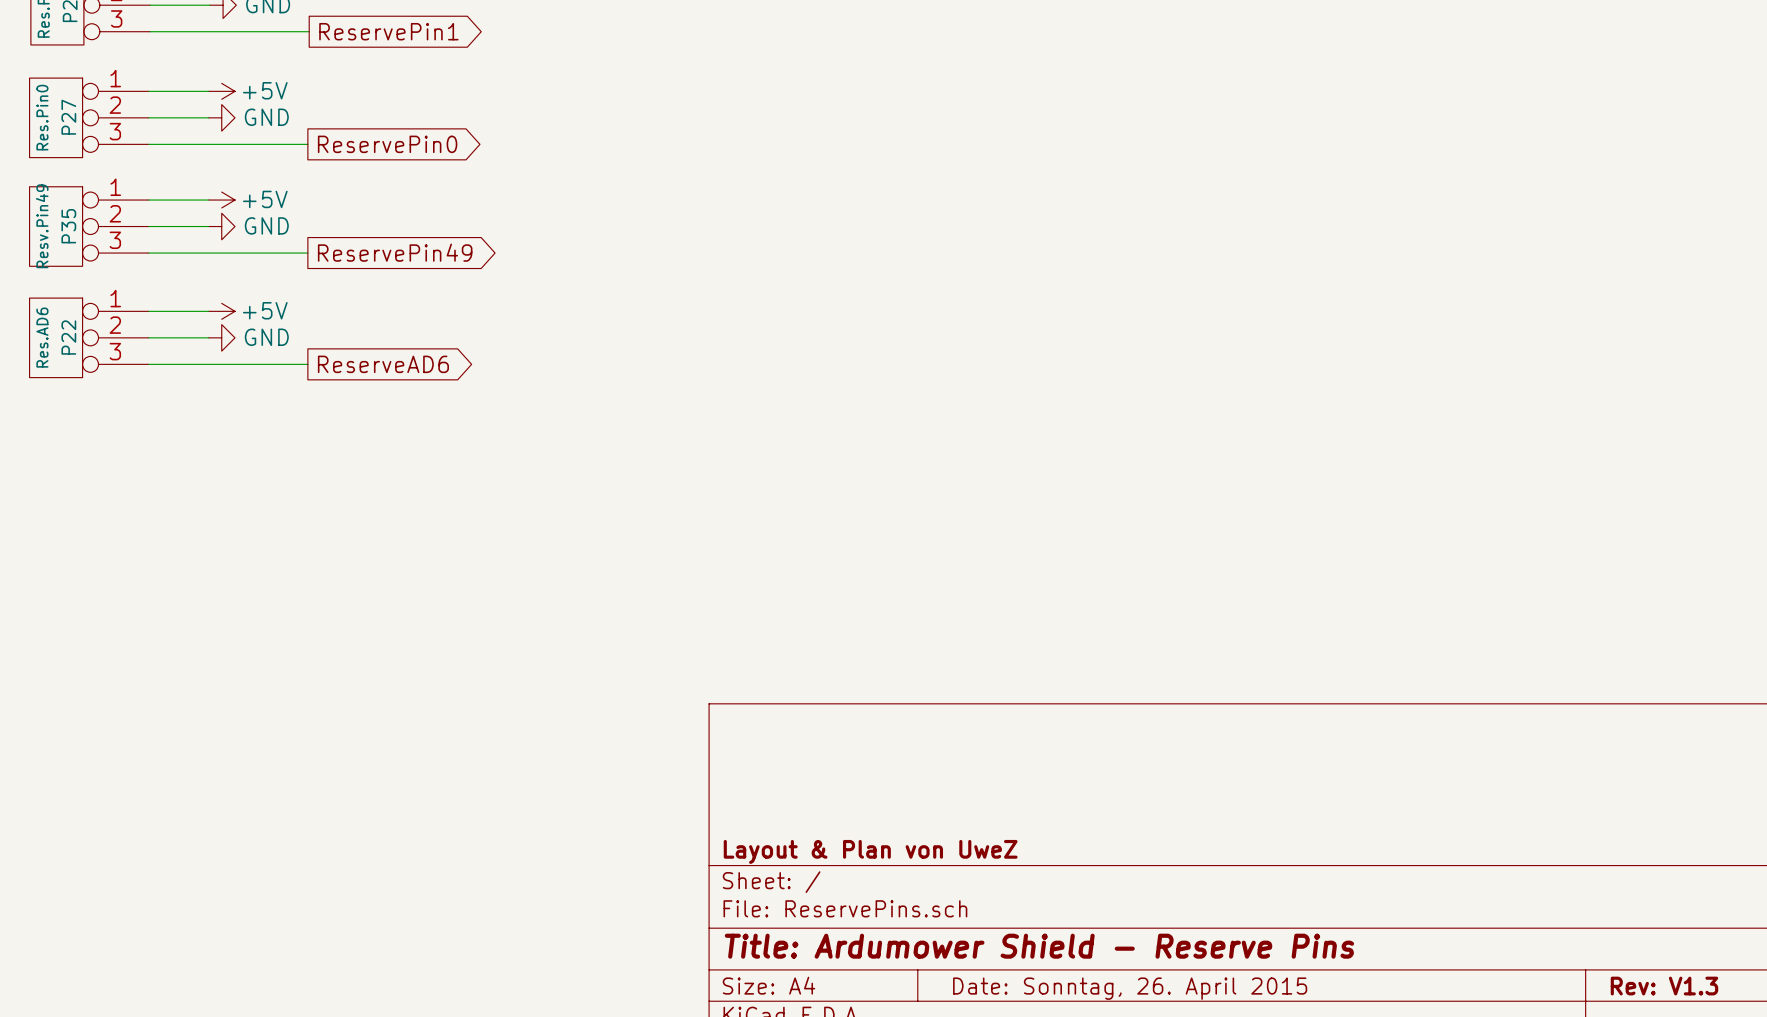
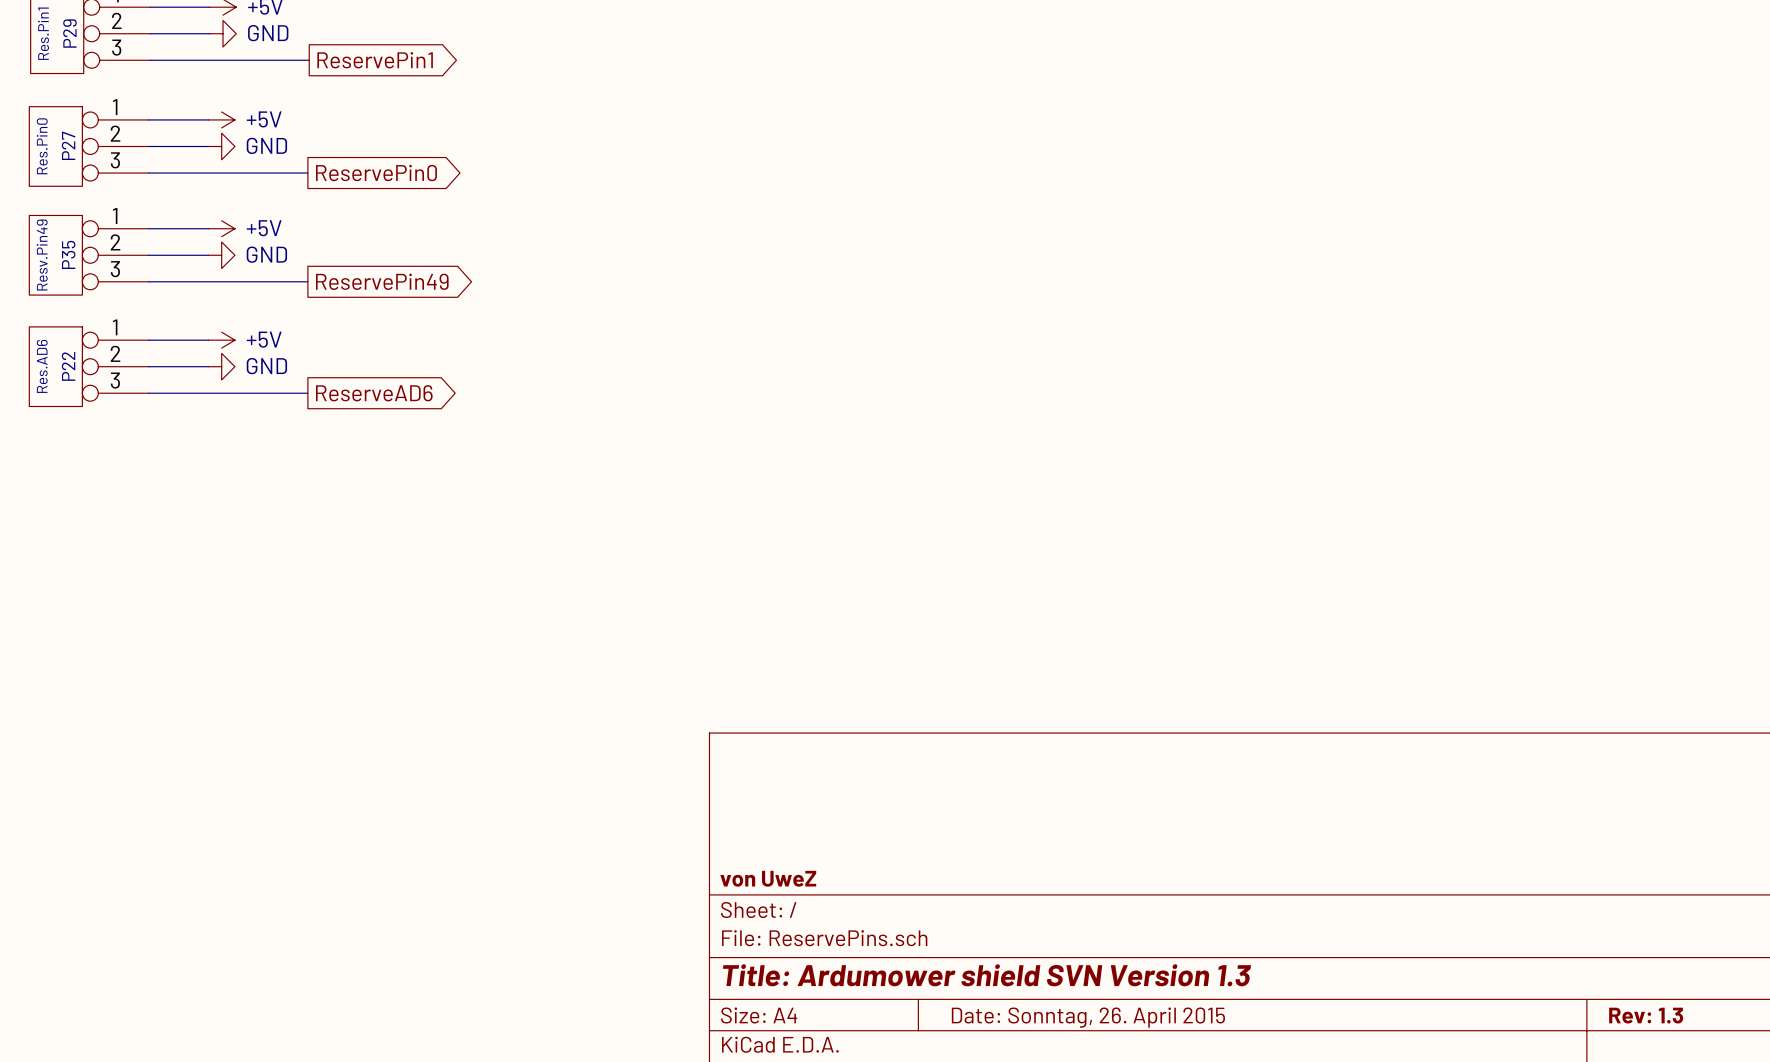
title block: Layout & Plan von UweZ (870, 851) -> von UweZ (768, 878)
title block: Title: Ardumower Shield - Reserve Pins (1039, 946) -> Title: Ardumower shield SVN Version 1.3 (986, 975)
title block: Rev: V1.3 (1664, 986) -> Rev: 1.3 (1646, 1015)

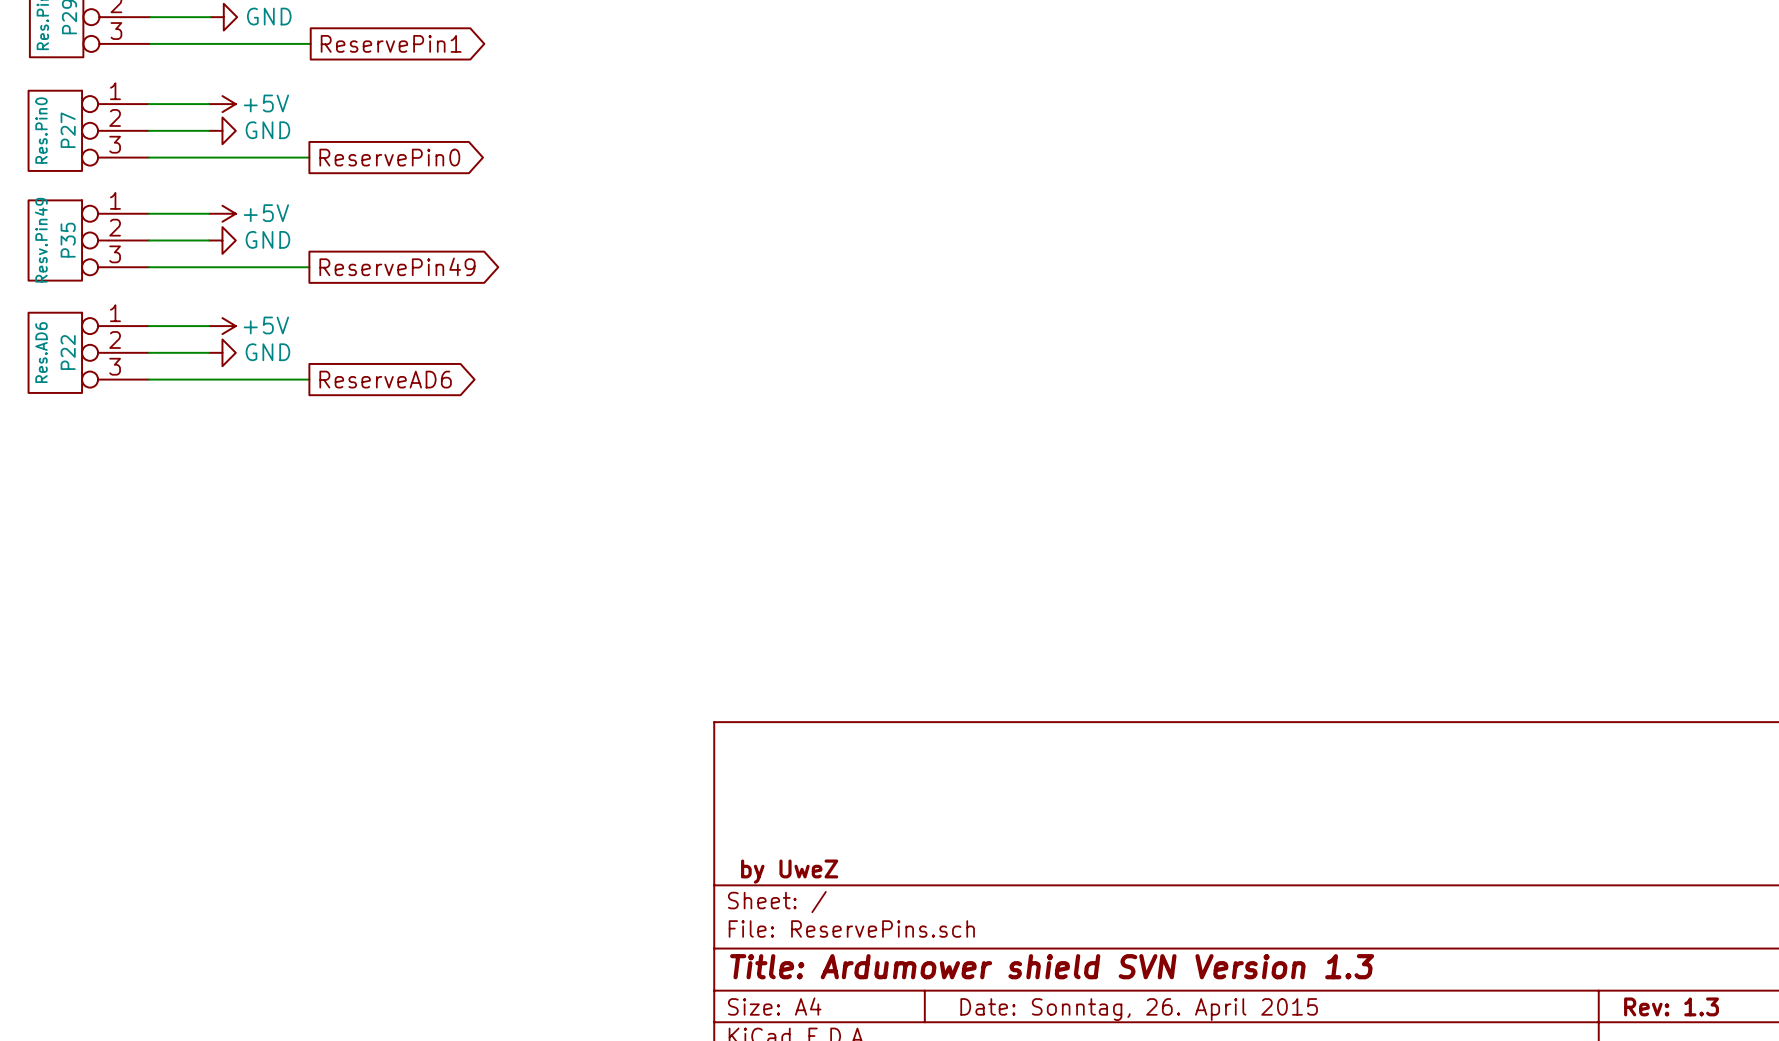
title block: von UweZ (768, 878) -> by UweZ (789, 871)

